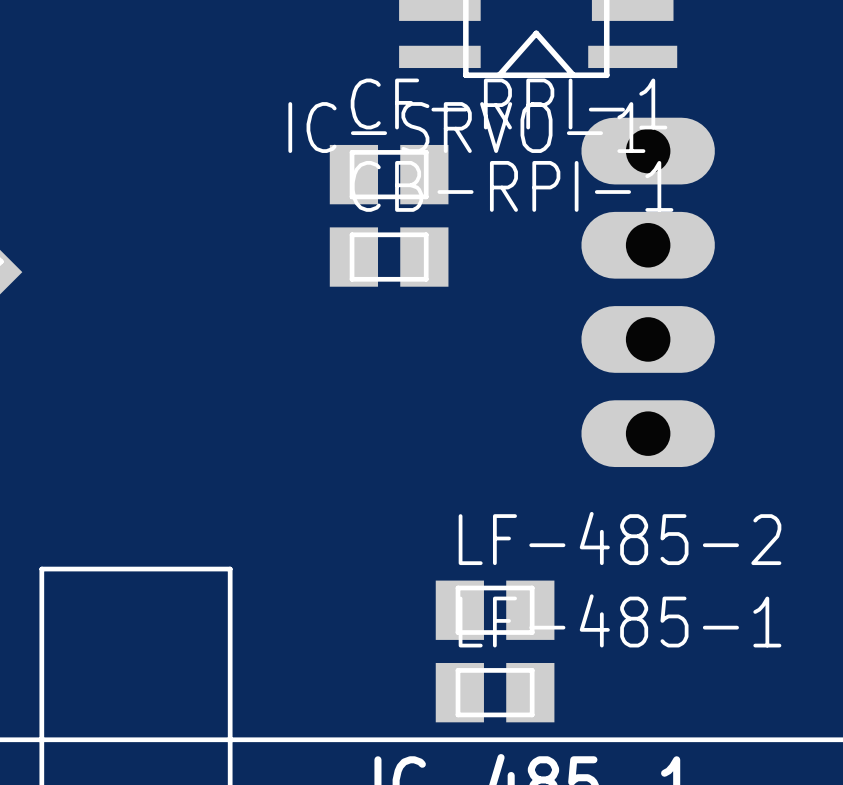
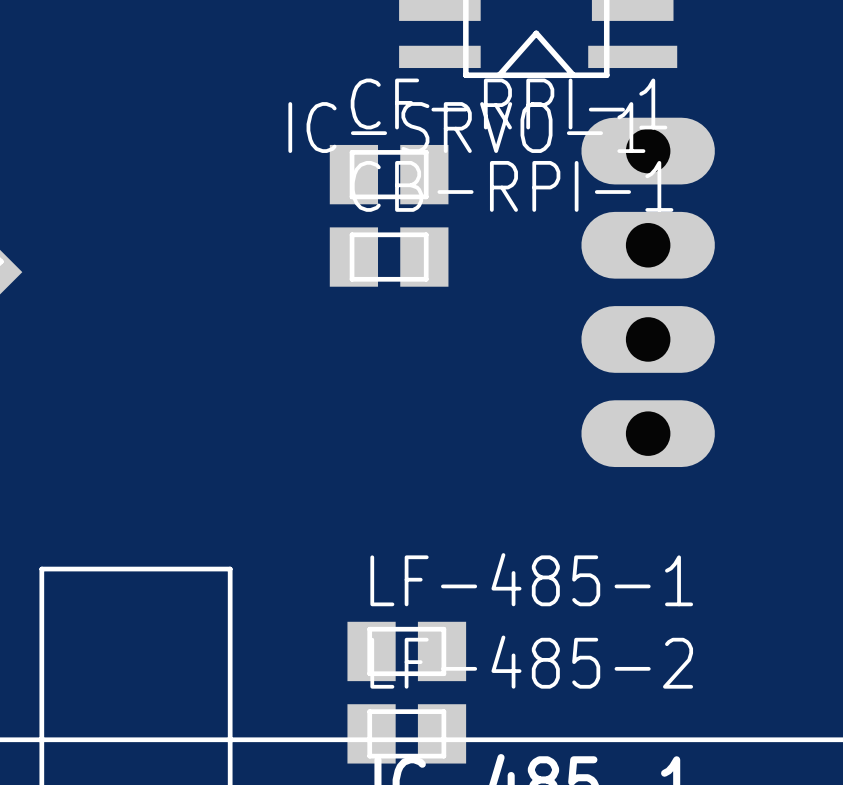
LF-485-2 position: (495, 610) -> (406, 733)
LF-485-1 position: (495, 692) -> (406, 651)

